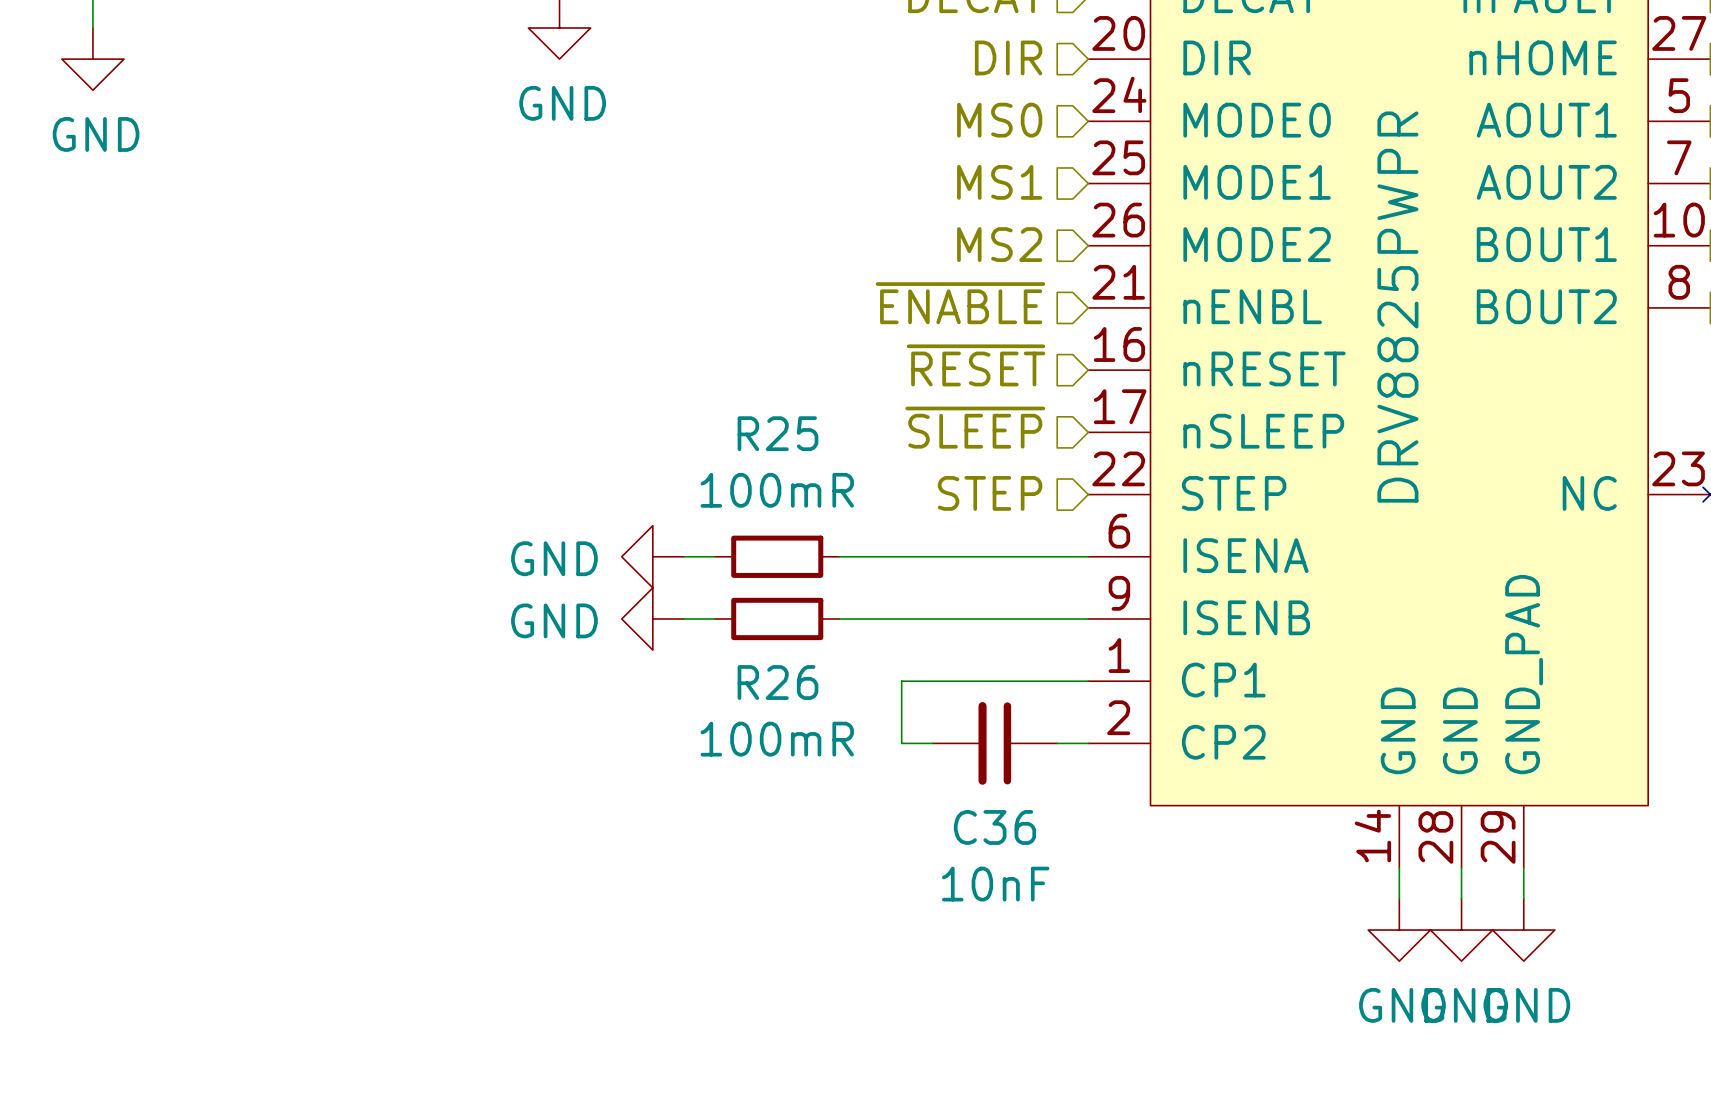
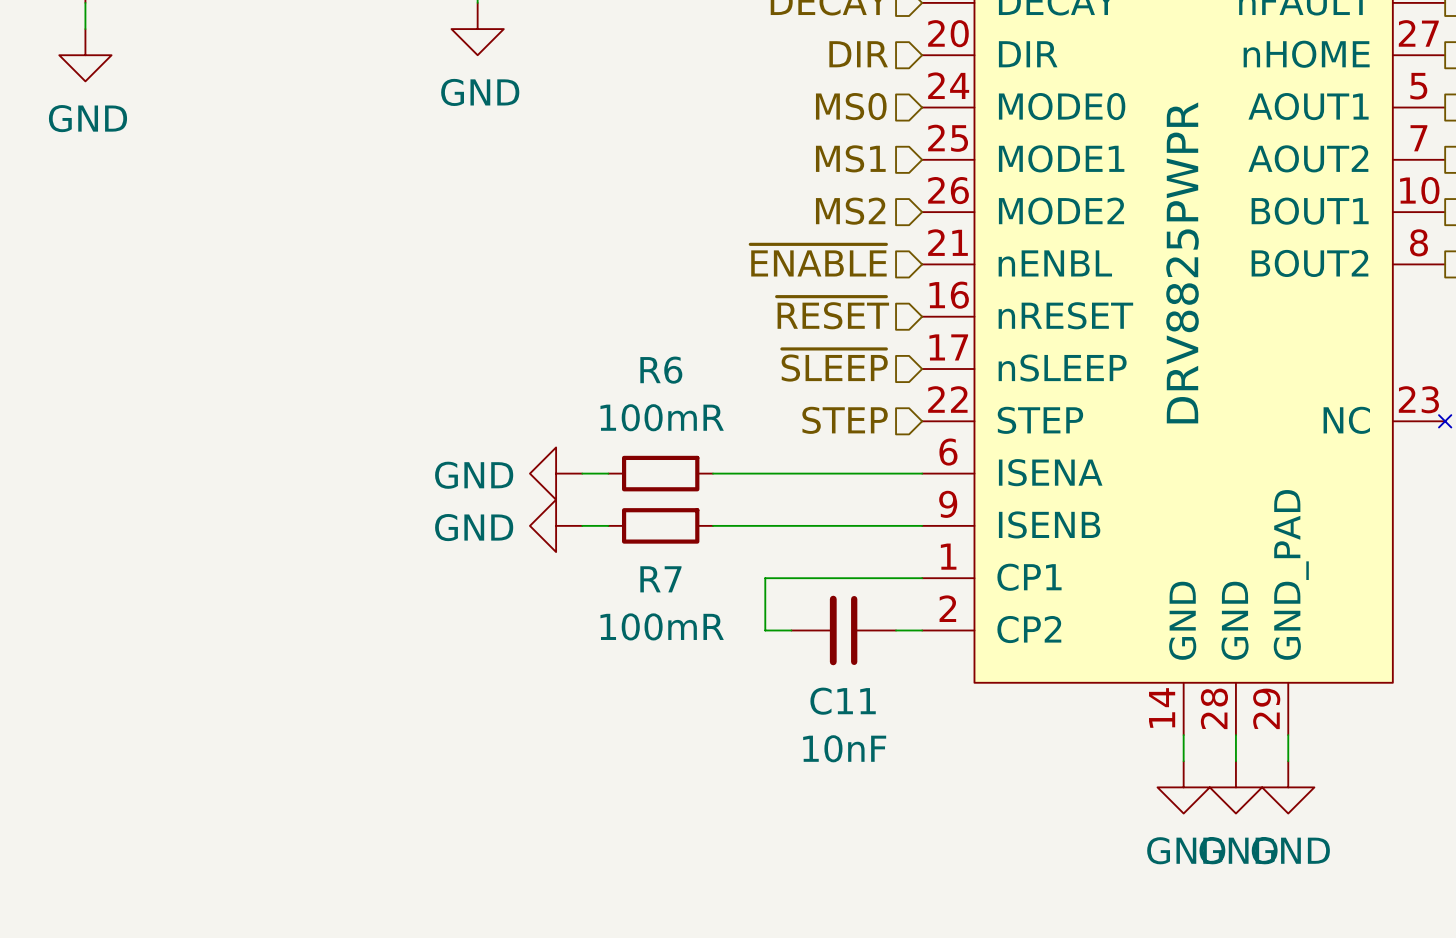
R25 name: R25 (777, 433) -> R6 (661, 370)
R26 name: R26 (777, 682) -> R7 (660, 579)
C36 name: C36 (994, 827) -> C11 (843, 701)

